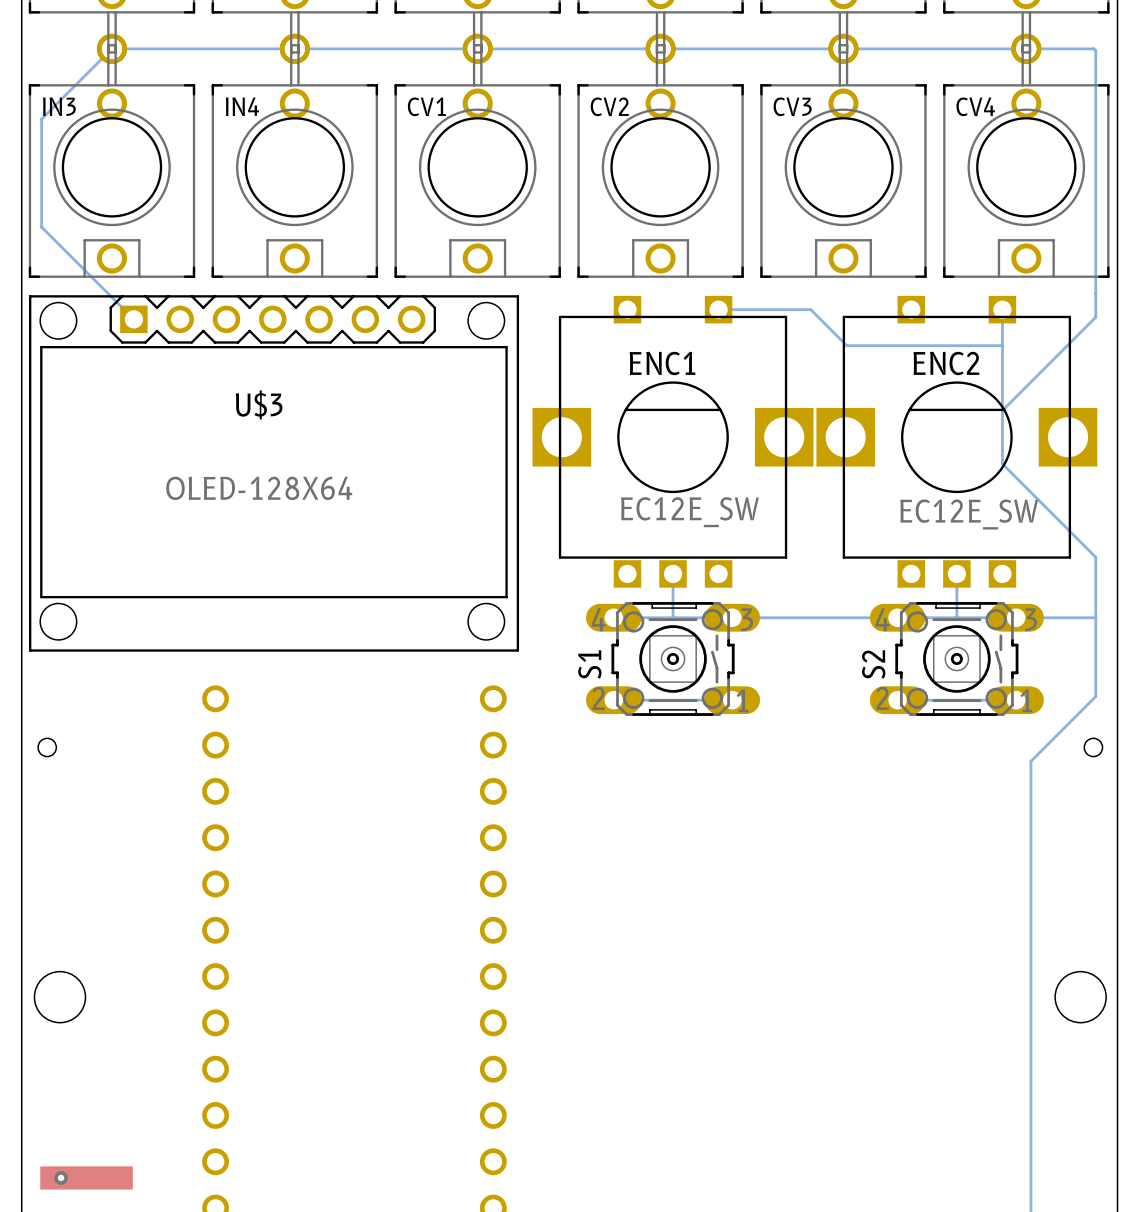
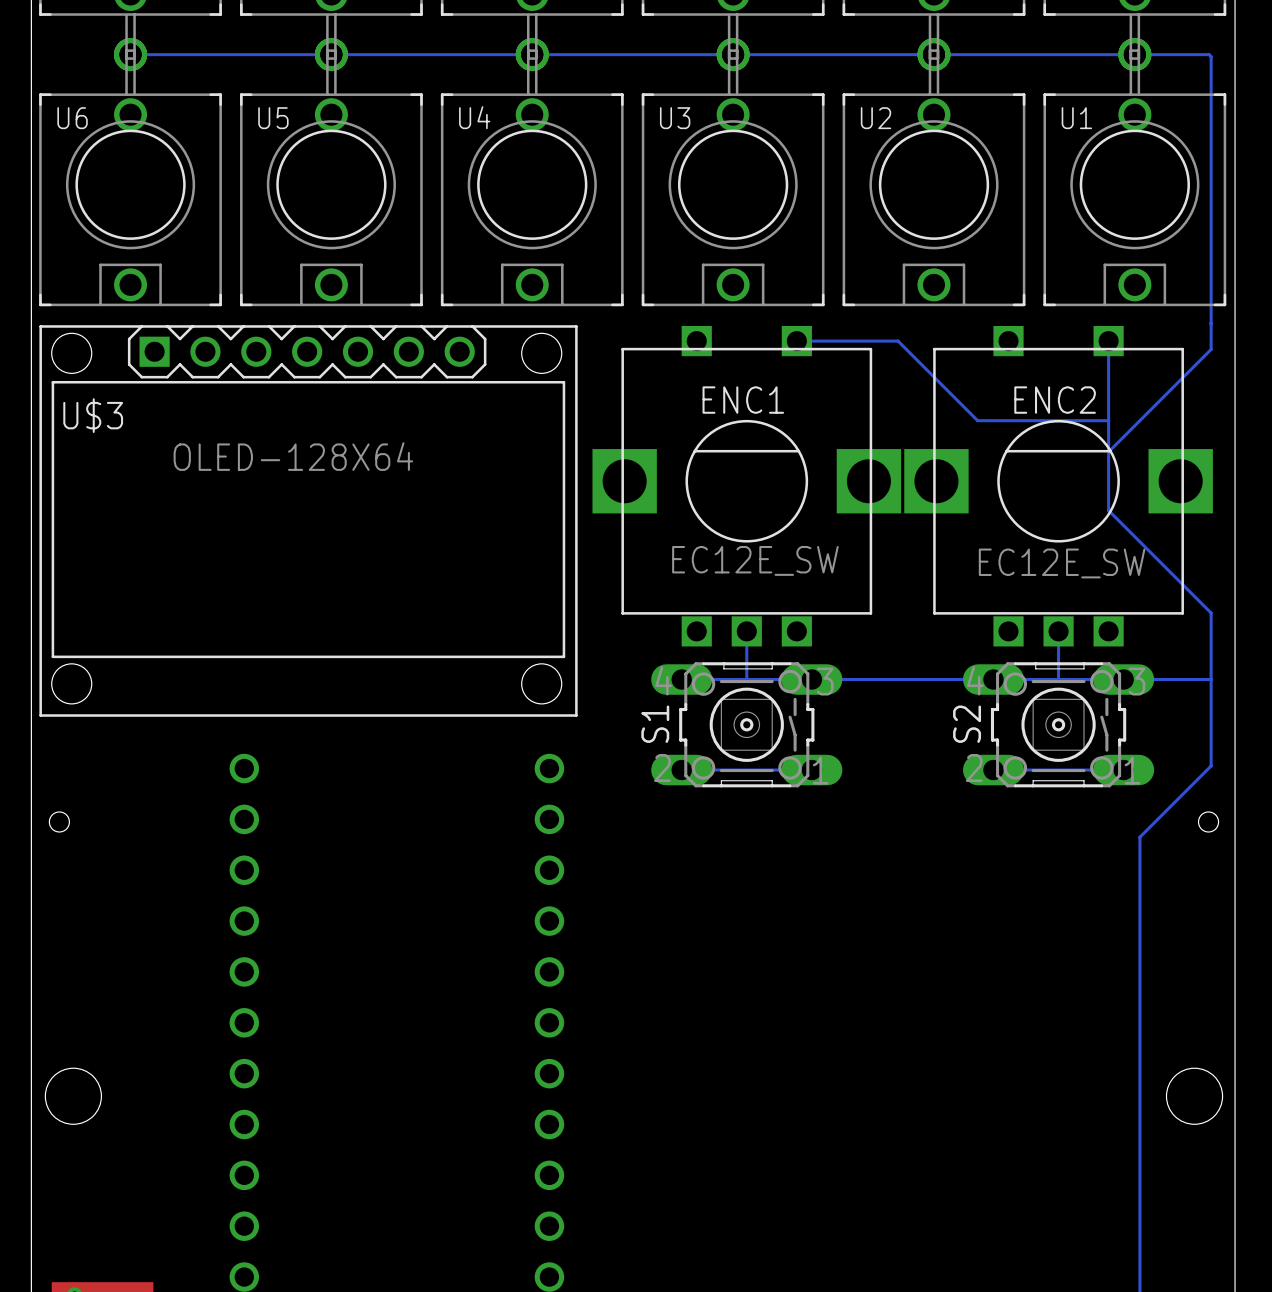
bottom track: (111, 48) (41, 119) (41, 227) (133, 319) -> none
IN3 name: IN3 (59, 106) -> U6 (72, 118)
IN4 name: IN4 (242, 106) -> U5 (273, 118)
CV1 name: CV1 (426, 106) -> U4 (474, 117)
CV2 name: CV2 (609, 106) -> U3 (675, 118)
CV3 name: CV3 (792, 106) -> U2 (876, 118)
CV4 name: CV4 (975, 106) -> U1 (1076, 118)
bottom track: (846, 345) (1002, 345) -> (937, 380) (977, 420) (1108, 420)
U$3 name position: U$3 (259, 404) -> U$3 (93, 415)
U$3 value position: OLED-128X64 (259, 488) -> OLED-128X64 (293, 456)

